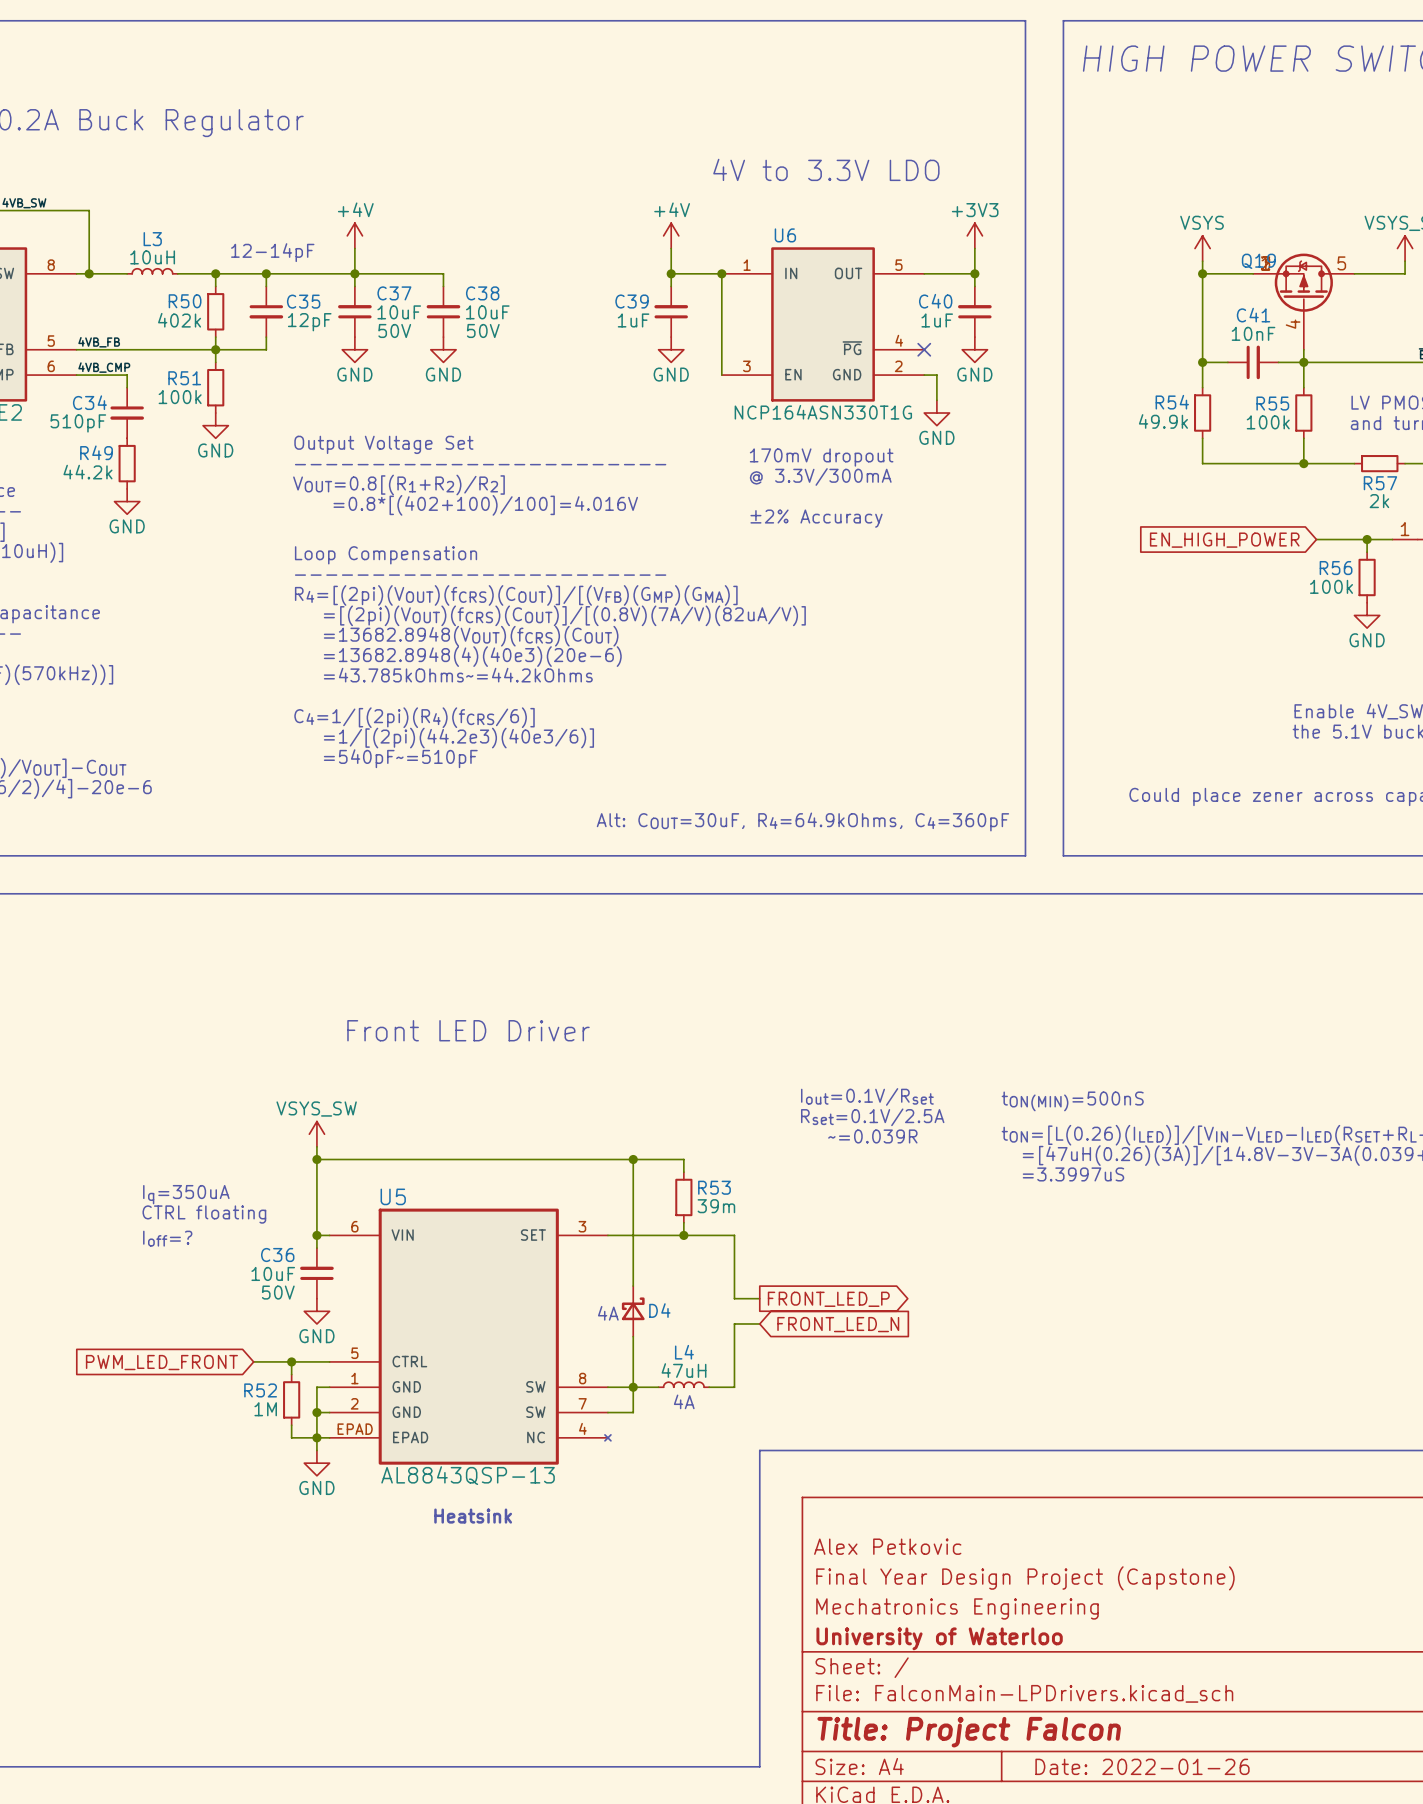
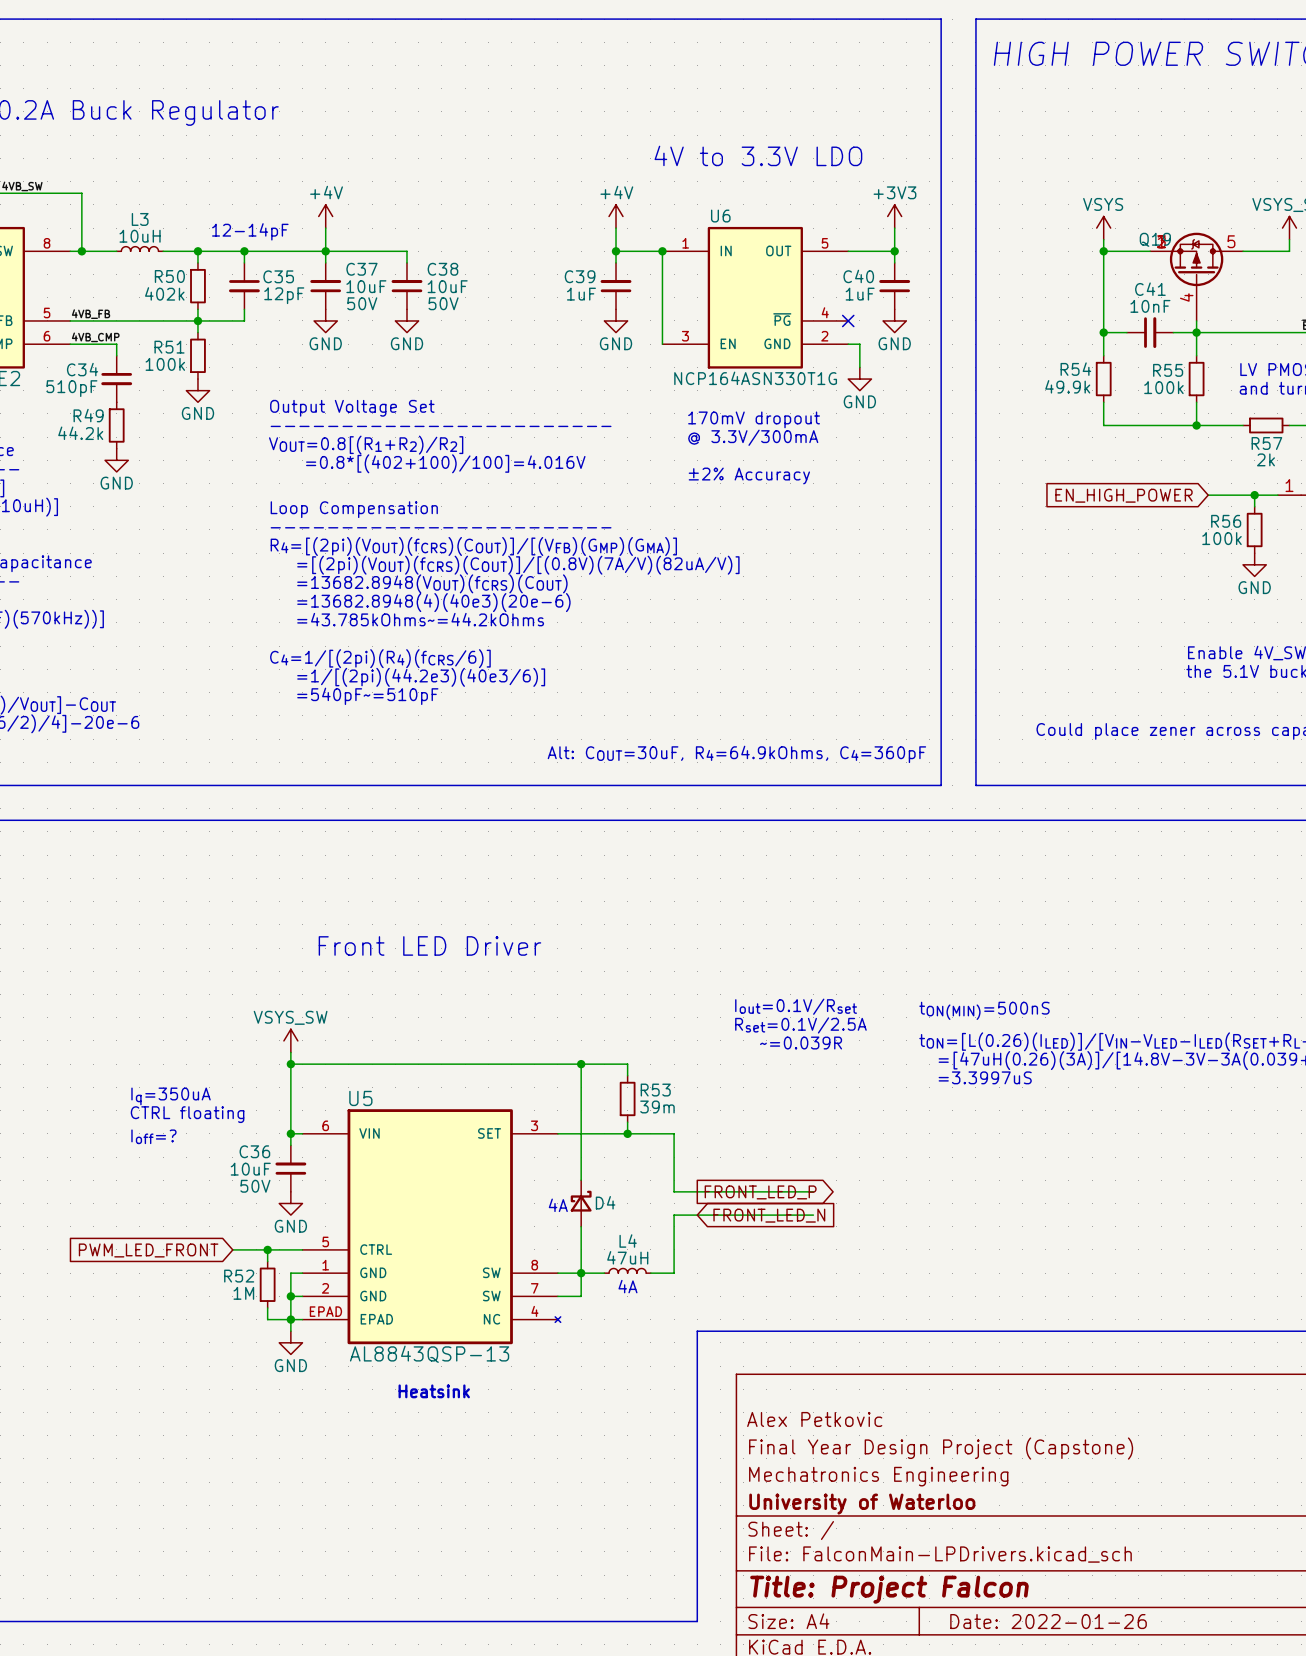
wire: none -> (697, 1191) (813, 1191)
wire: none -> (697, 1215) (813, 1215)

